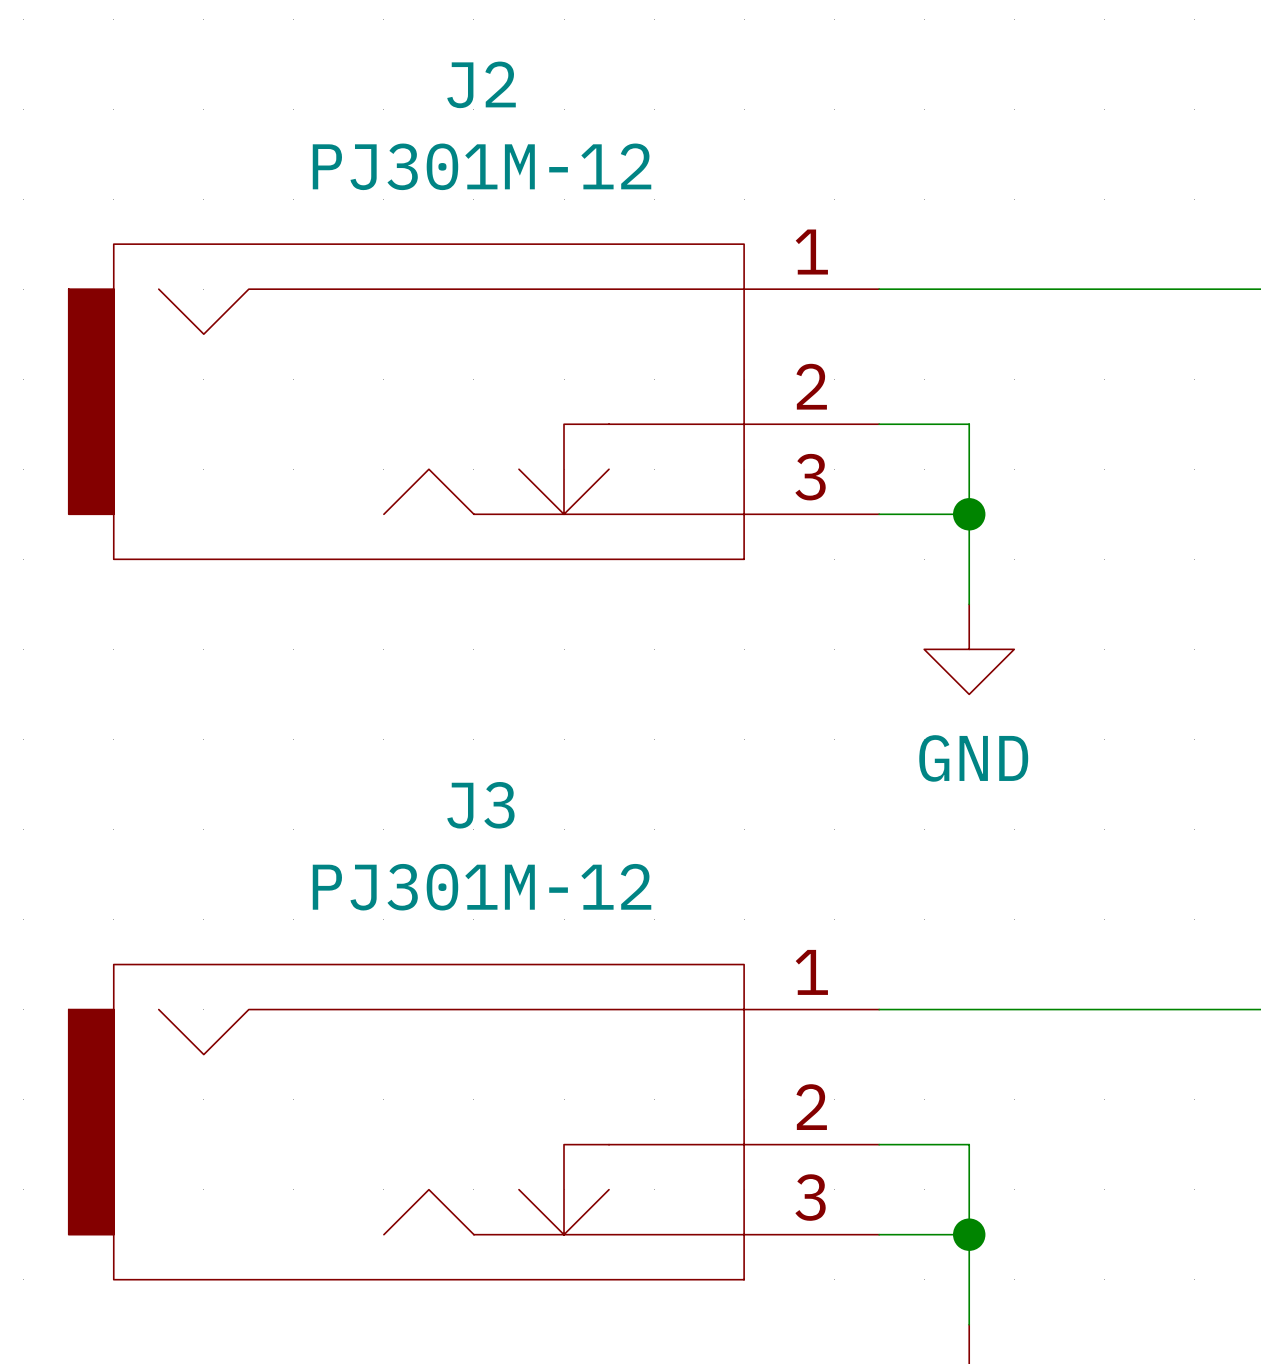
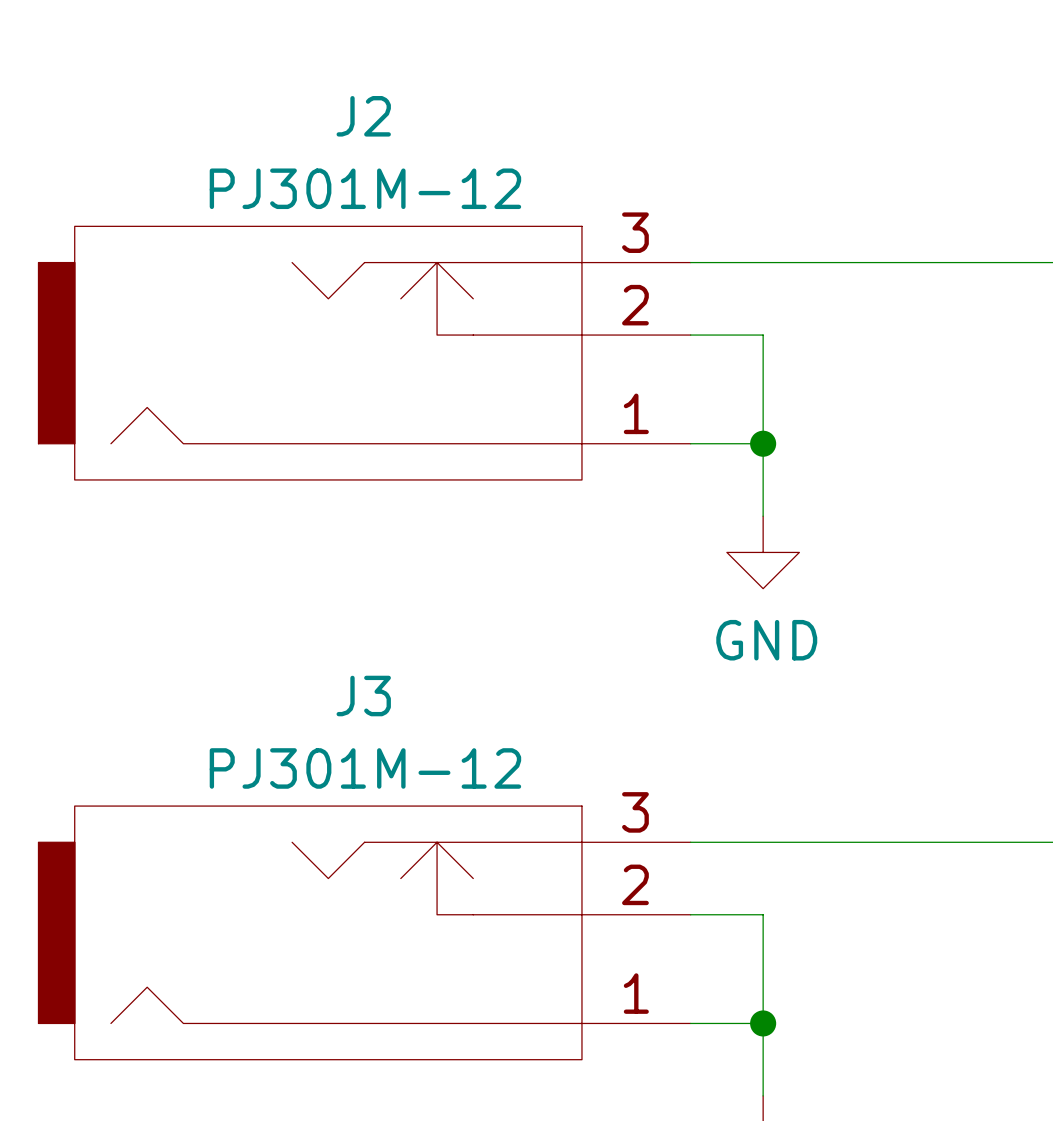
J2 flip: as is (406, 401) -> up-down (310, 353)
wire: (879, 424) (969, 424) -> (690, 335) (763, 335) (763, 371)
J3 flip: as is (406, 1122) -> up-down (310, 932)
wire: (879, 1144) (969, 1144) -> (690, 914) (763, 914) (763, 950)

